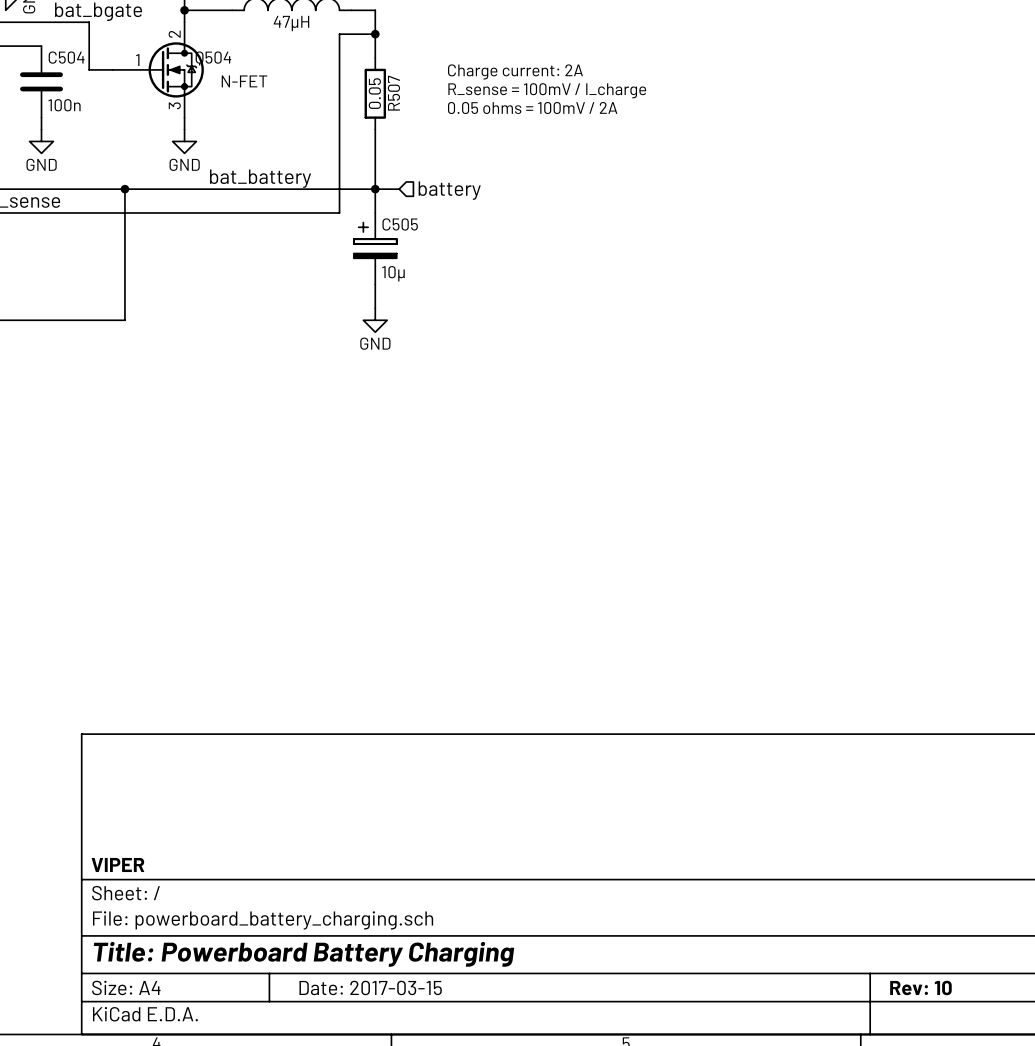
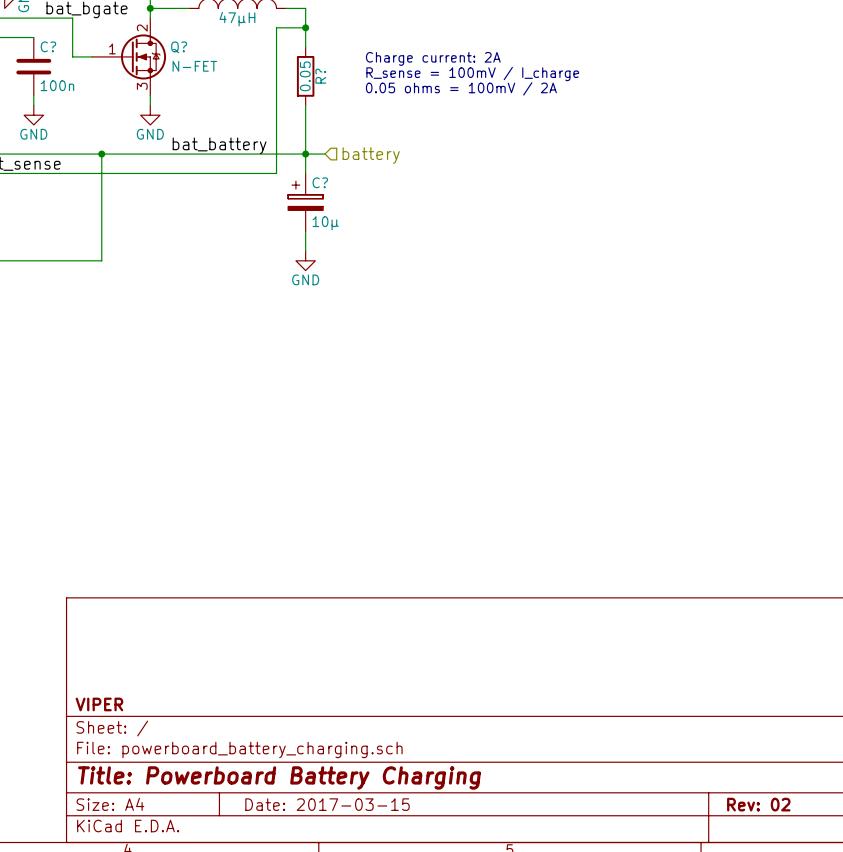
C504 name: C504 (66, 57) -> C? (48, 46)
Q504 name: Q504 (213, 58) -> Q? (179, 47)
R507 name: R507 (393, 93) -> R? (320, 76)
C505 name: C505 (400, 224) -> C? (320, 182)
title block: Rev: 10 (920, 987) -> Rev: 02 (758, 804)

